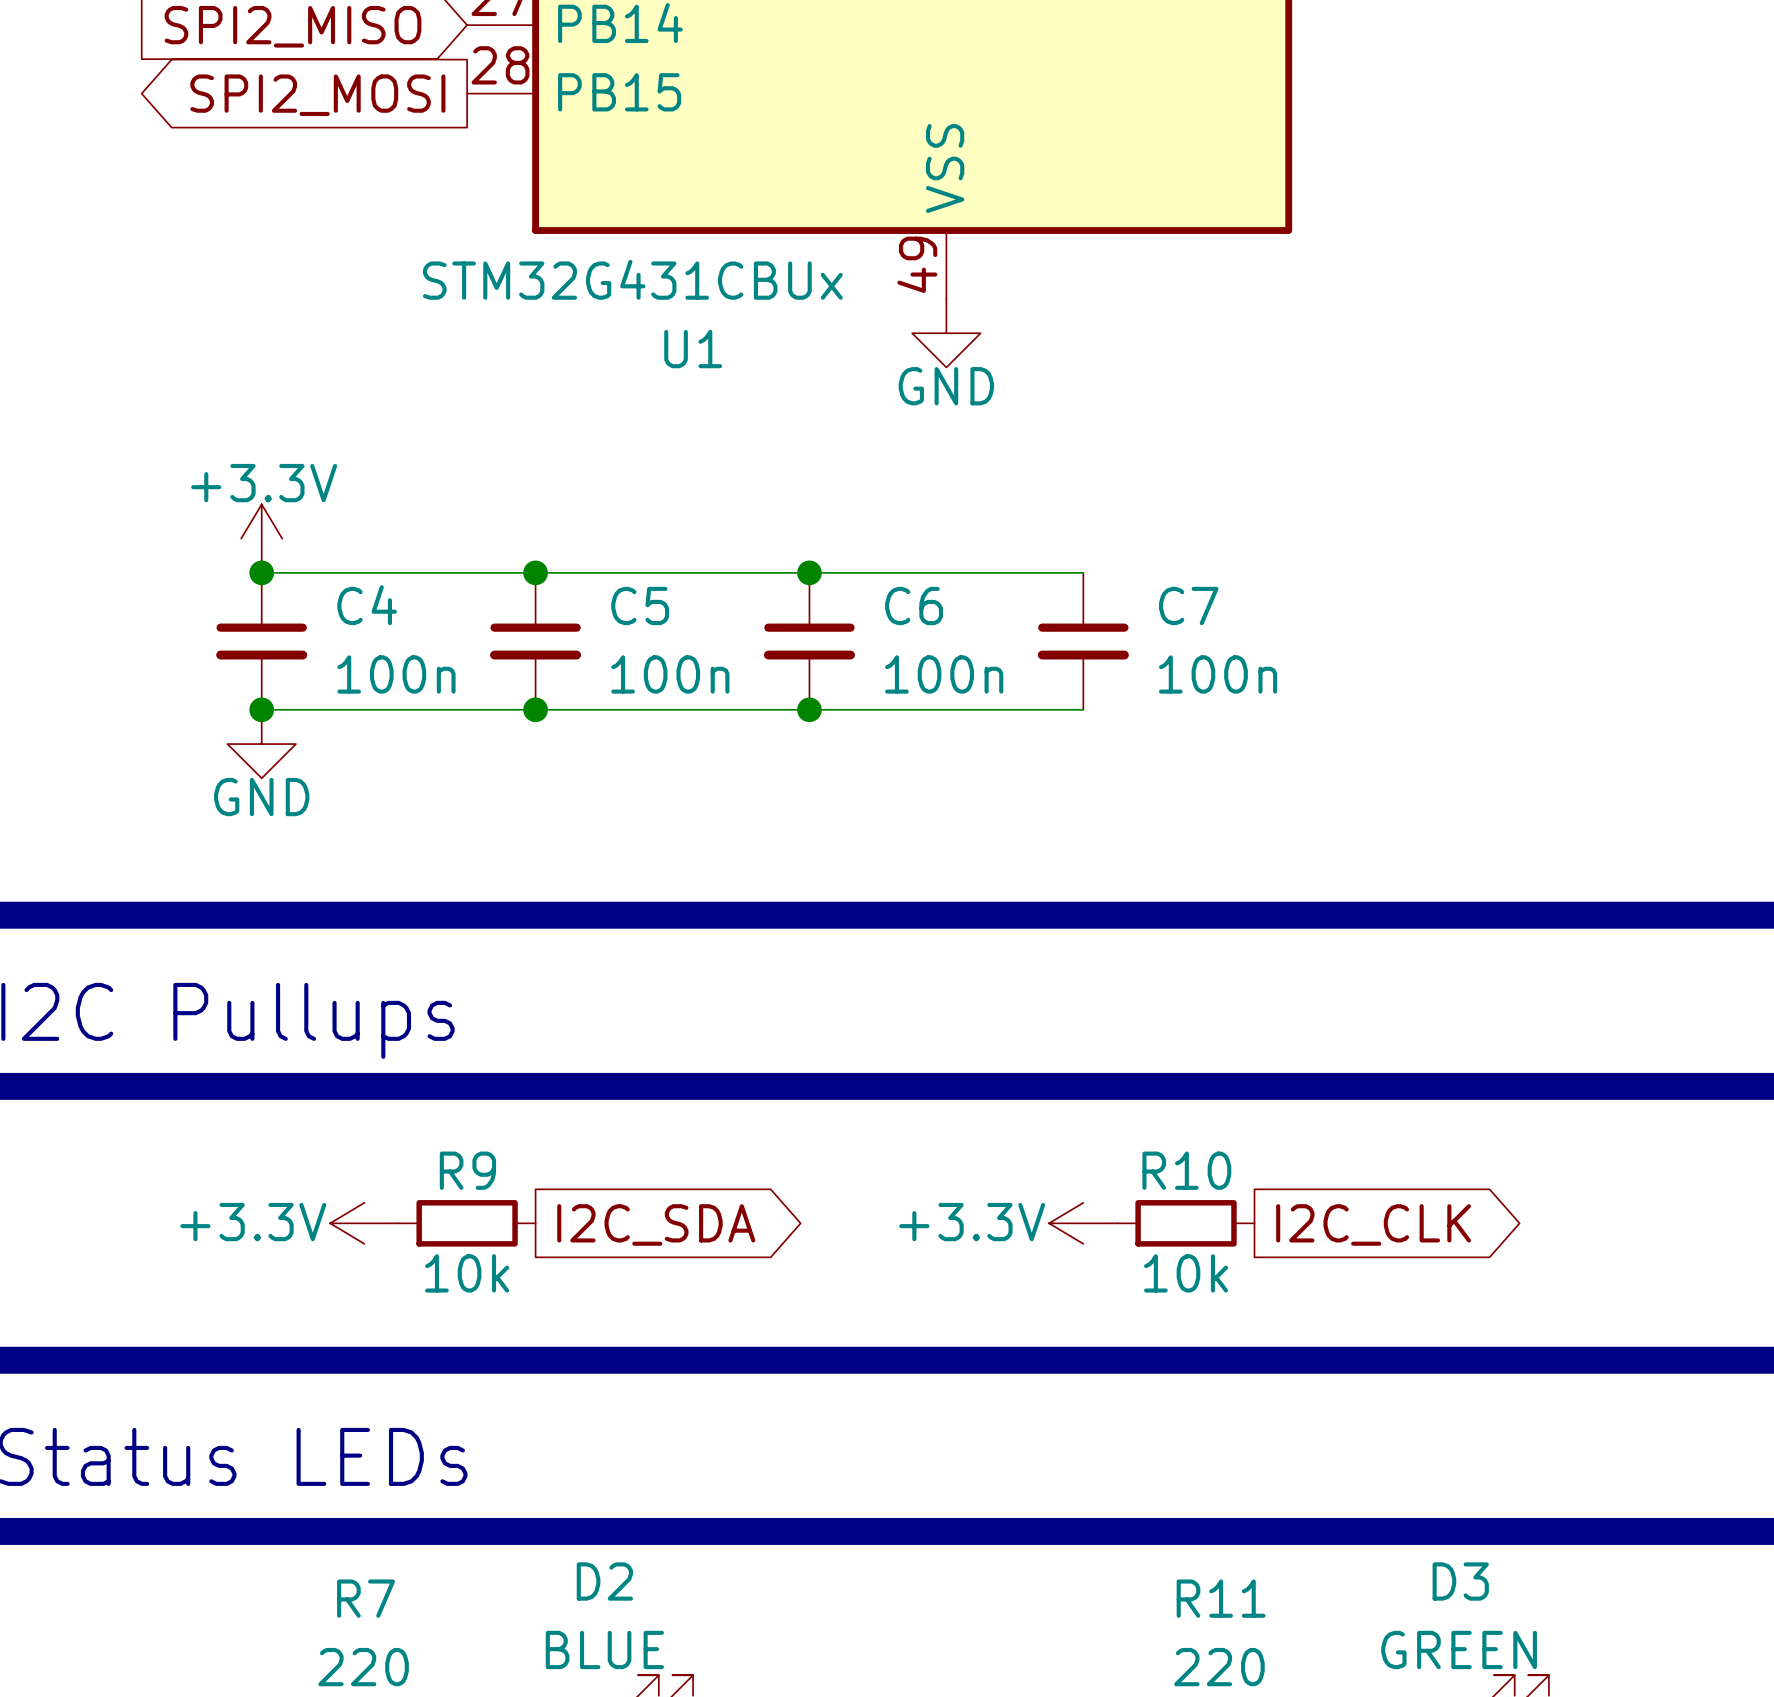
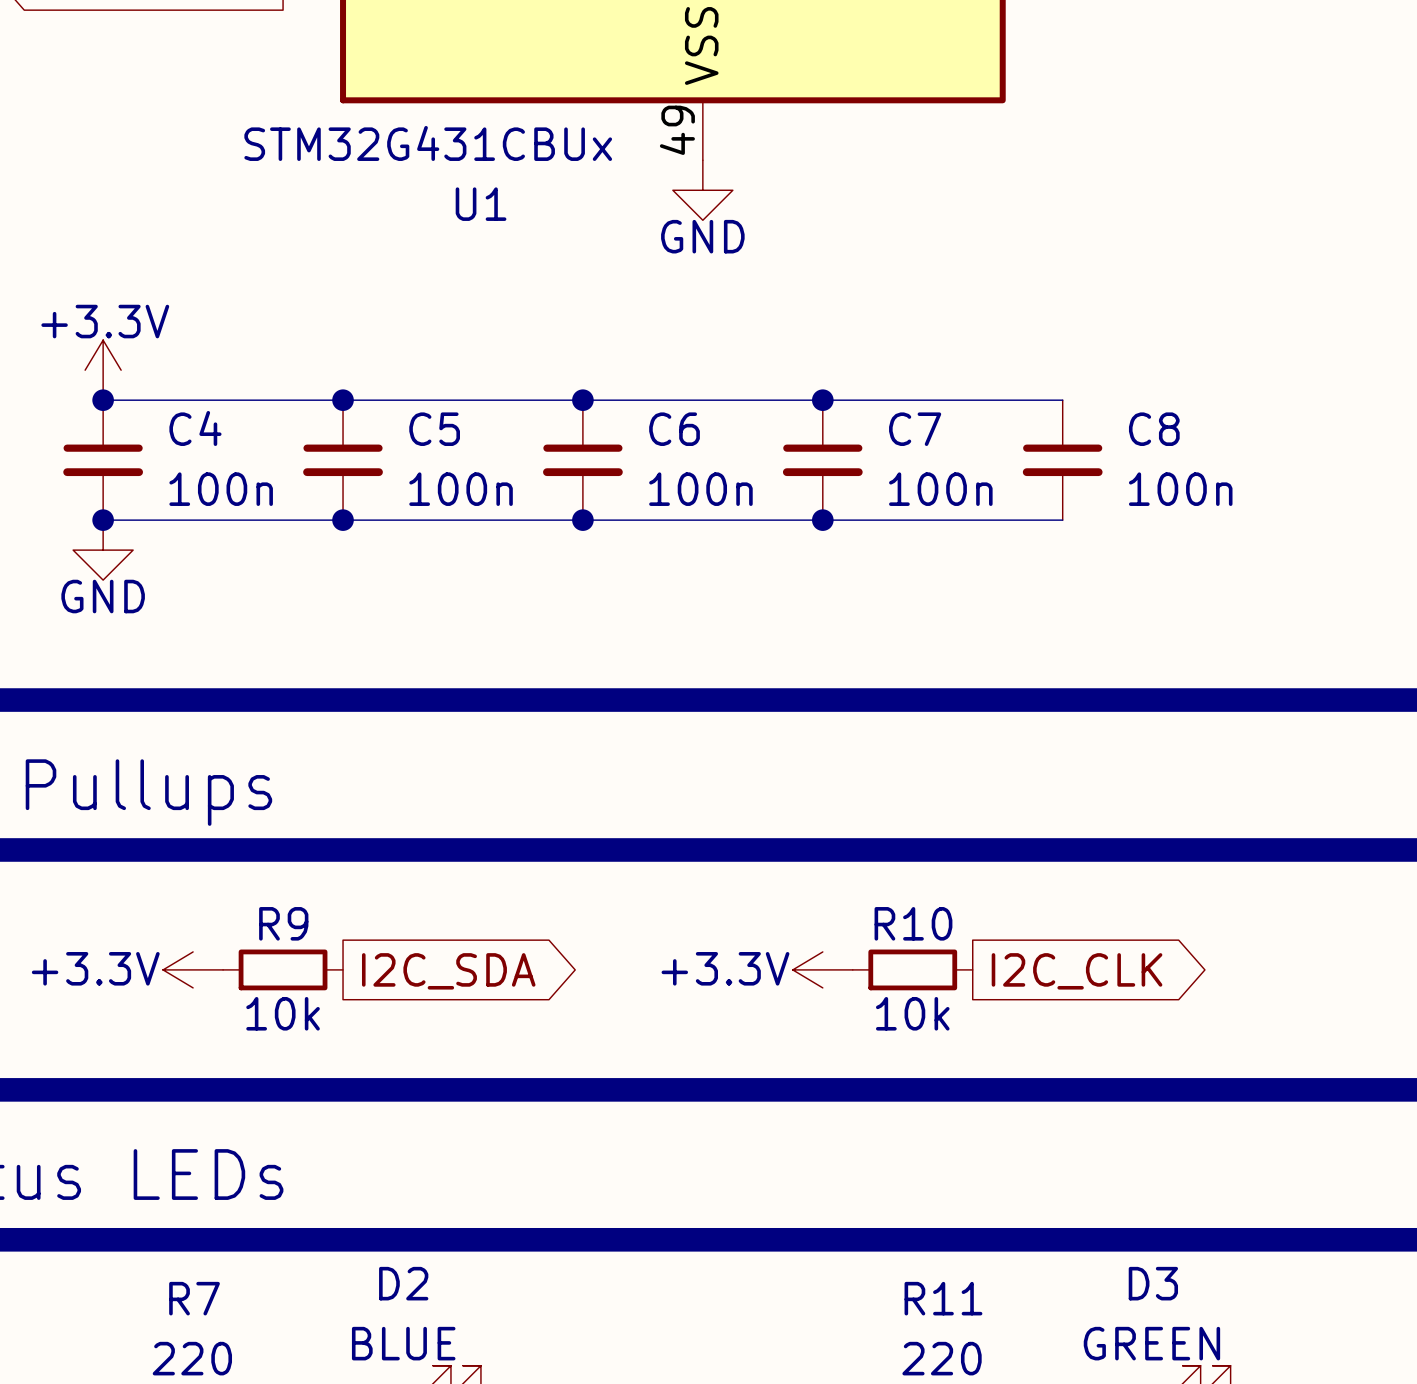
wire: none -> (822, 400) (1062, 400)
junction: none -> (822, 400)
C8: none -> 100n (1062, 460)
wire: none -> (822, 520) (1062, 520)
junction: none -> (822, 520)

